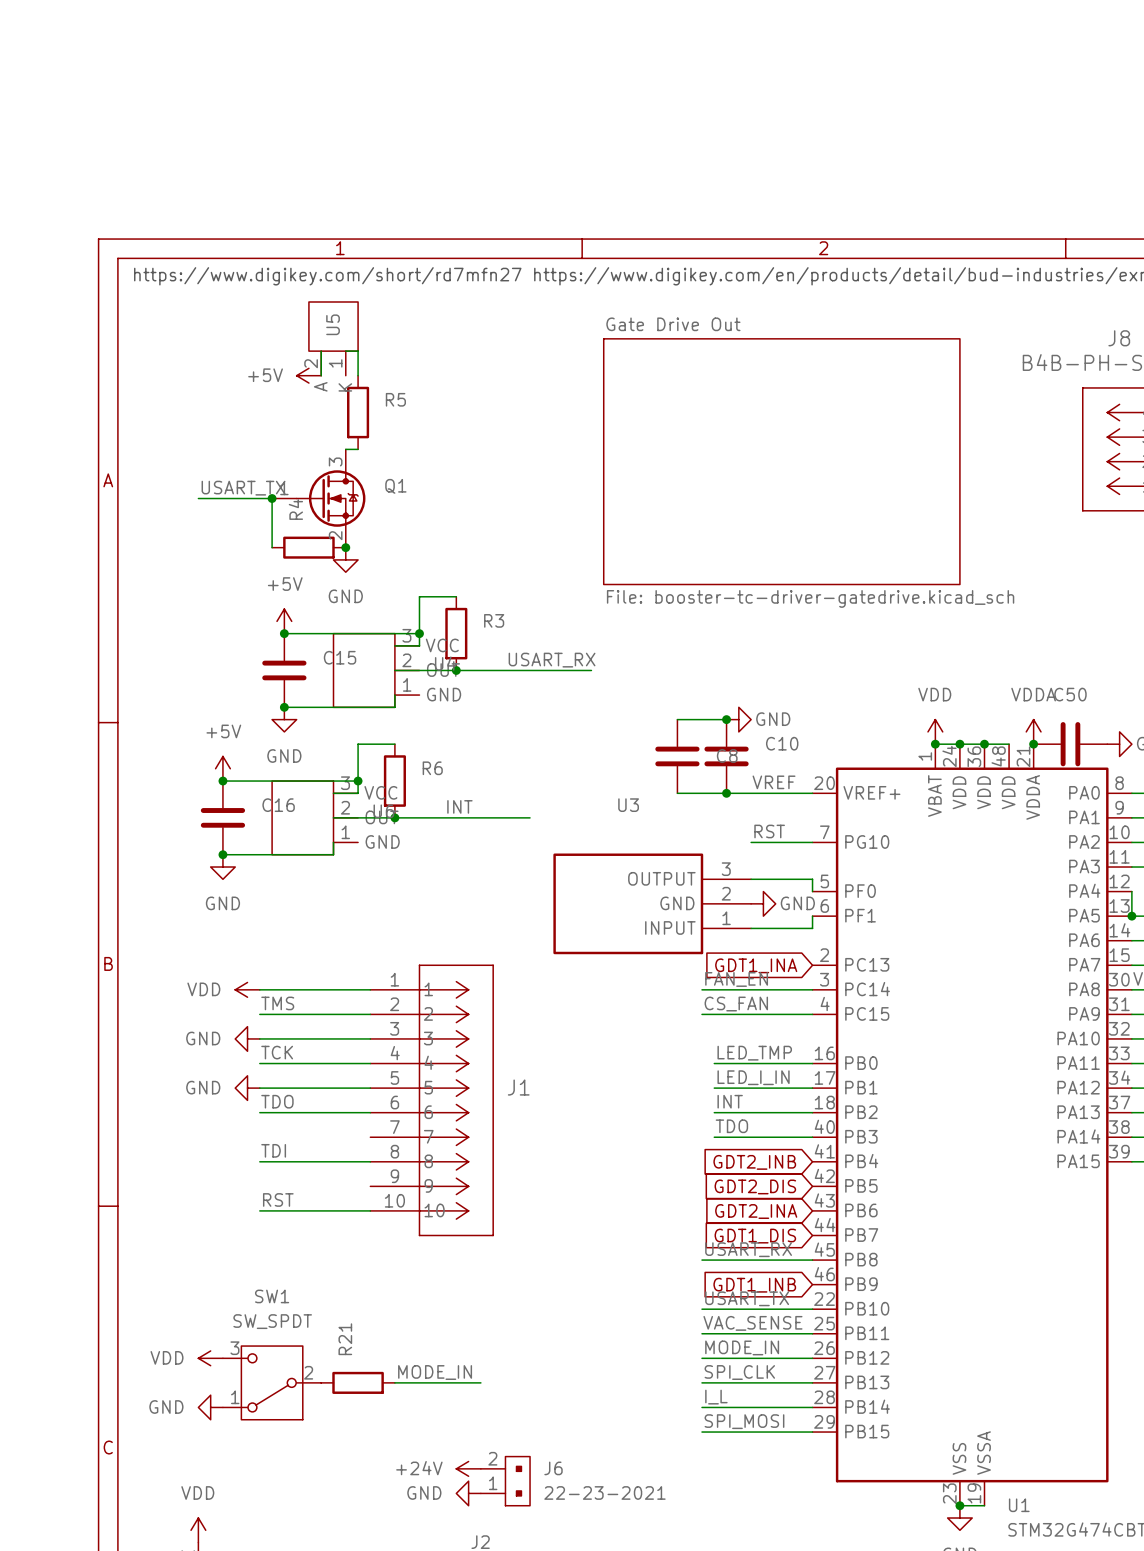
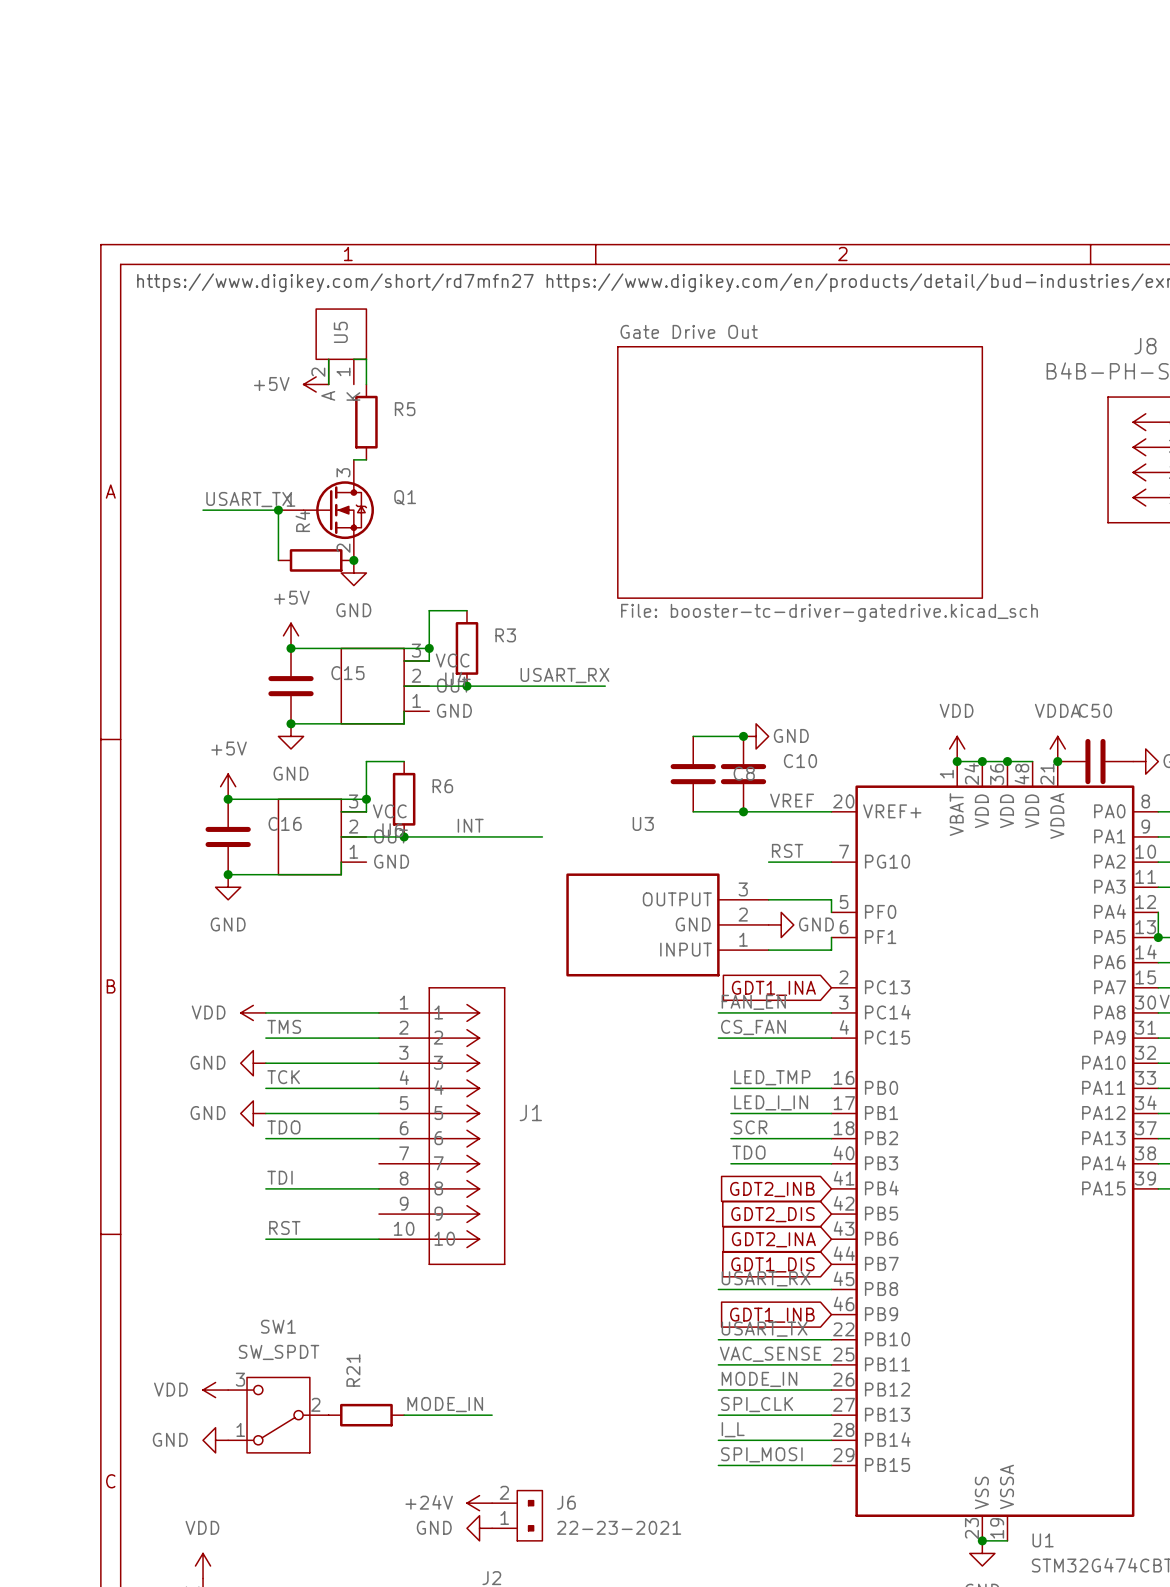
label: INT (730, 1101) -> SCR (750, 1127)

